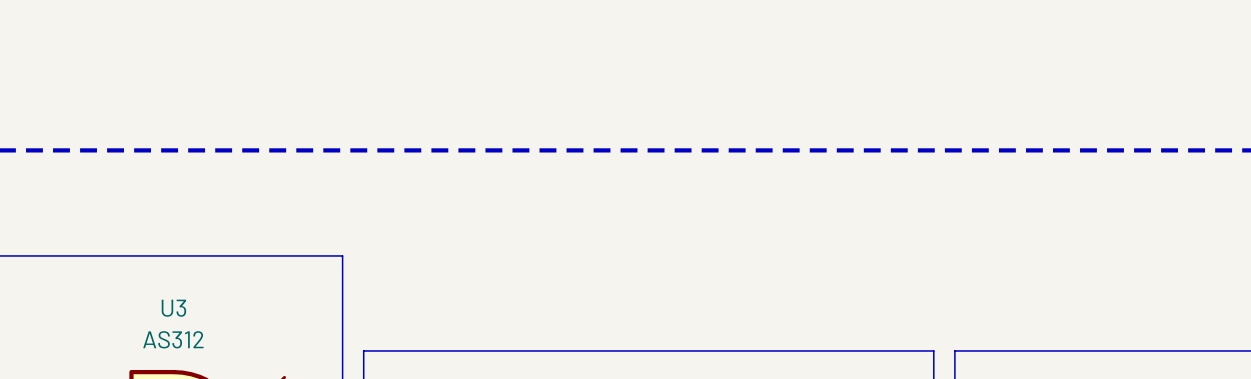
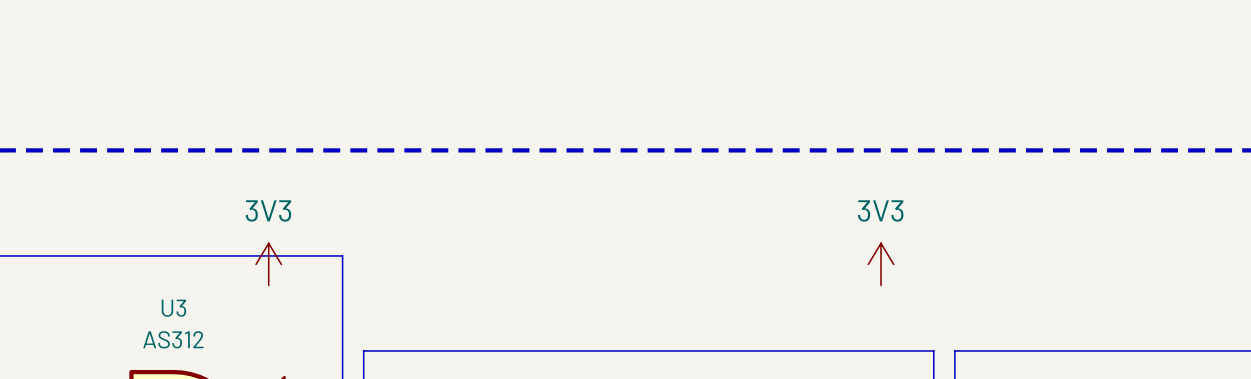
power symbol: none -> 3V3 (268, 264)
power symbol: none -> 3V3 (881, 264)

